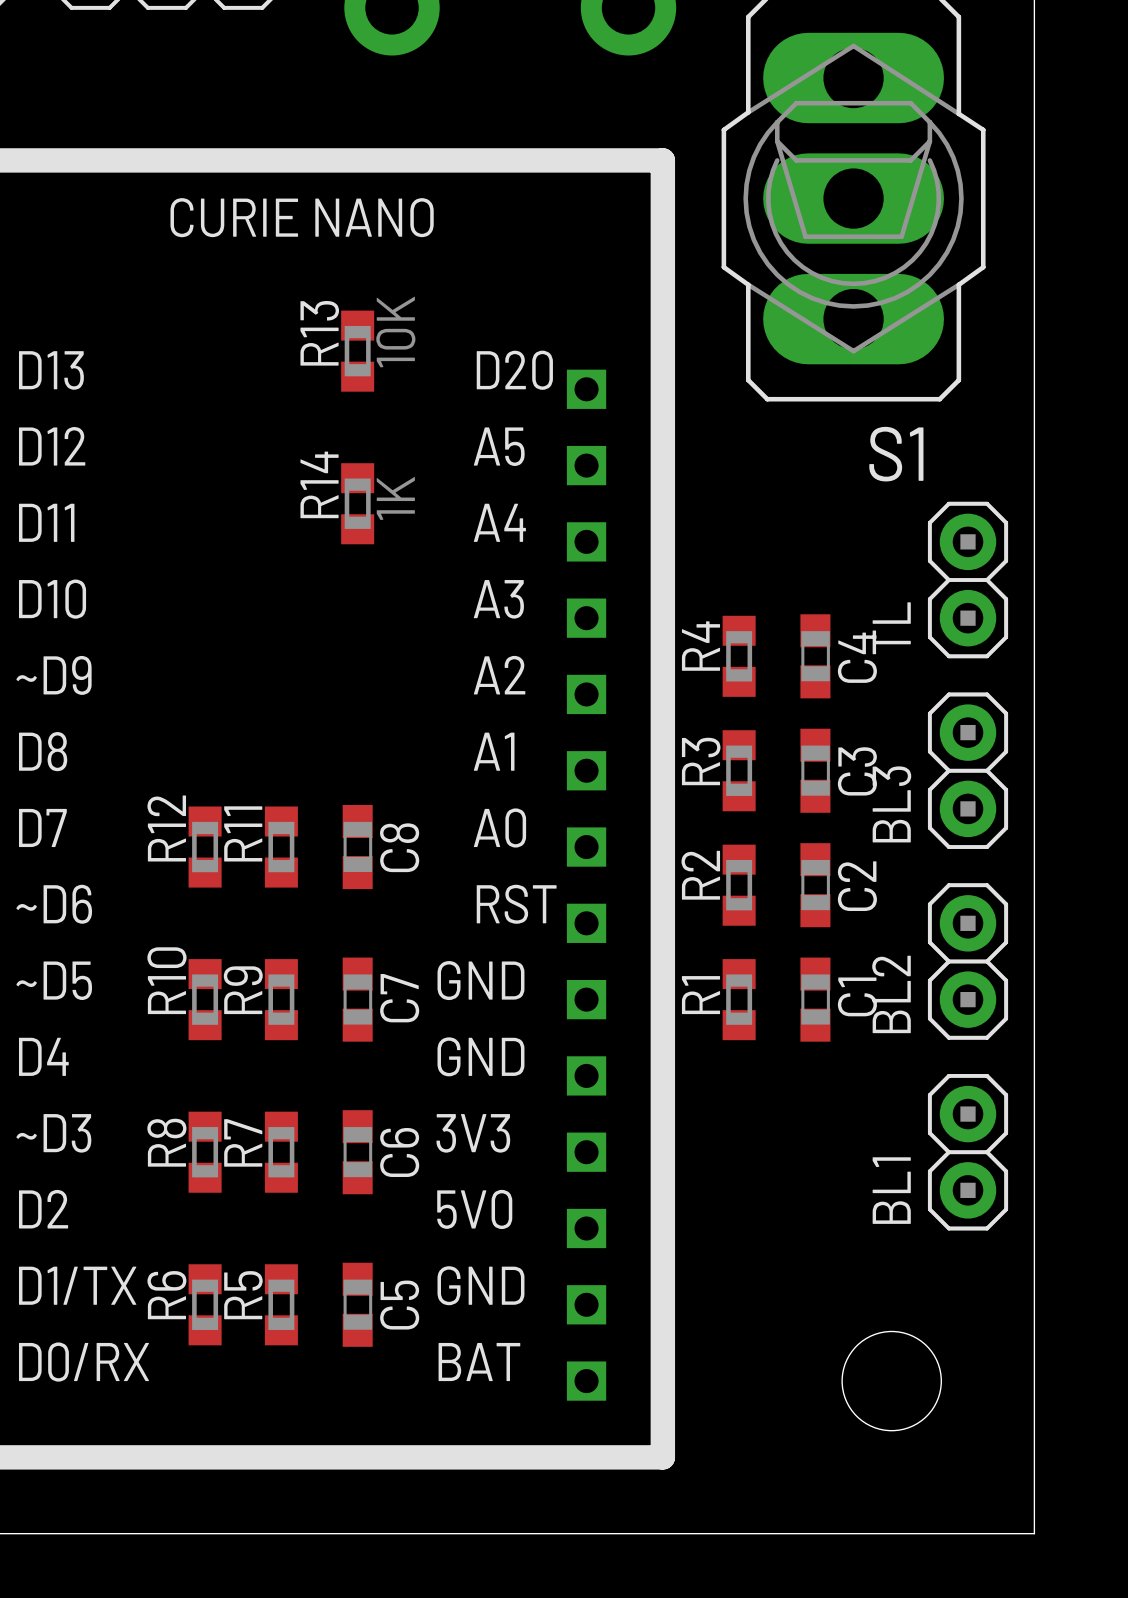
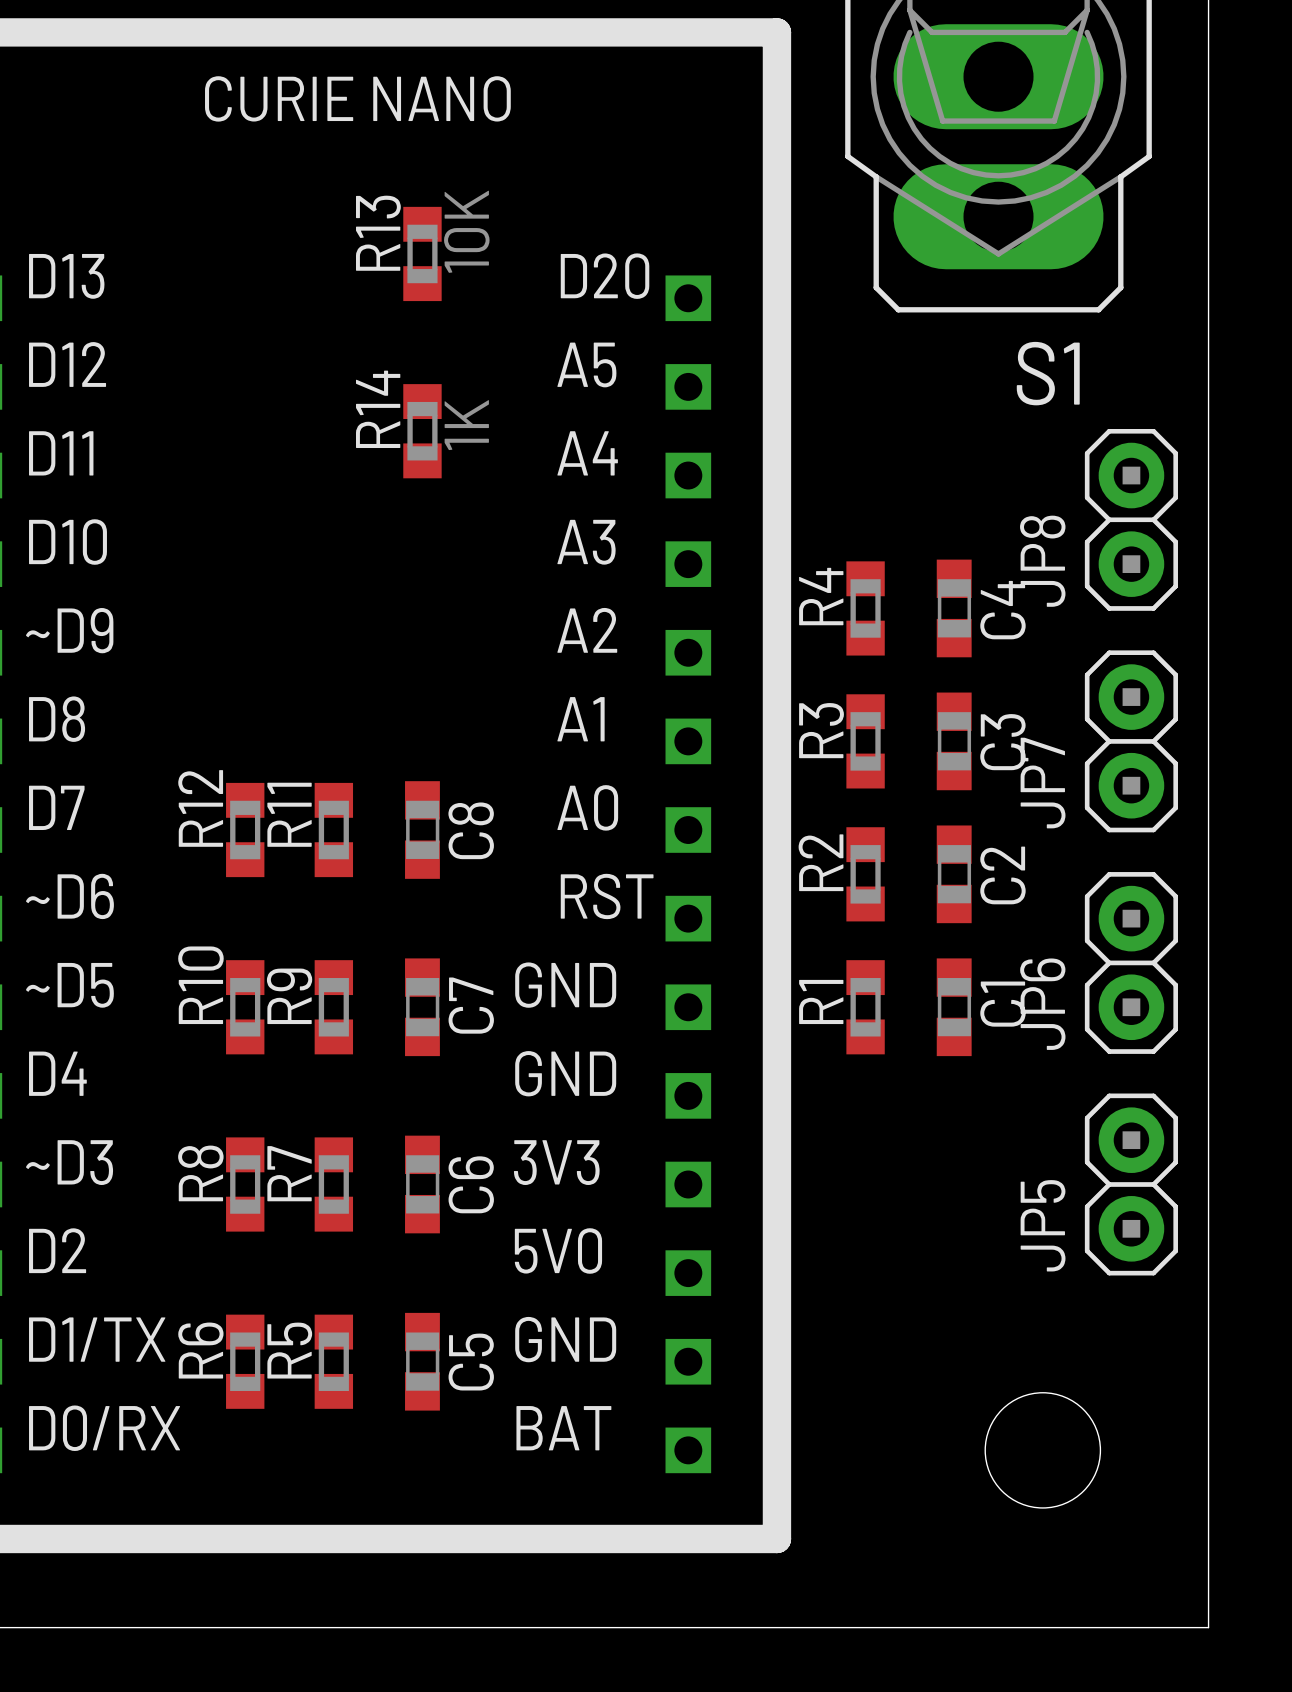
TL name: TL (891, 628) -> JP8 (1042, 561)
BL3 name: BL3 (891, 804) -> JP7 (1043, 783)
BL2 name: BL2 (891, 994) -> JP6 (1042, 1004)
BL1 name: BL1 (891, 1190) -> JP5 (1043, 1225)

